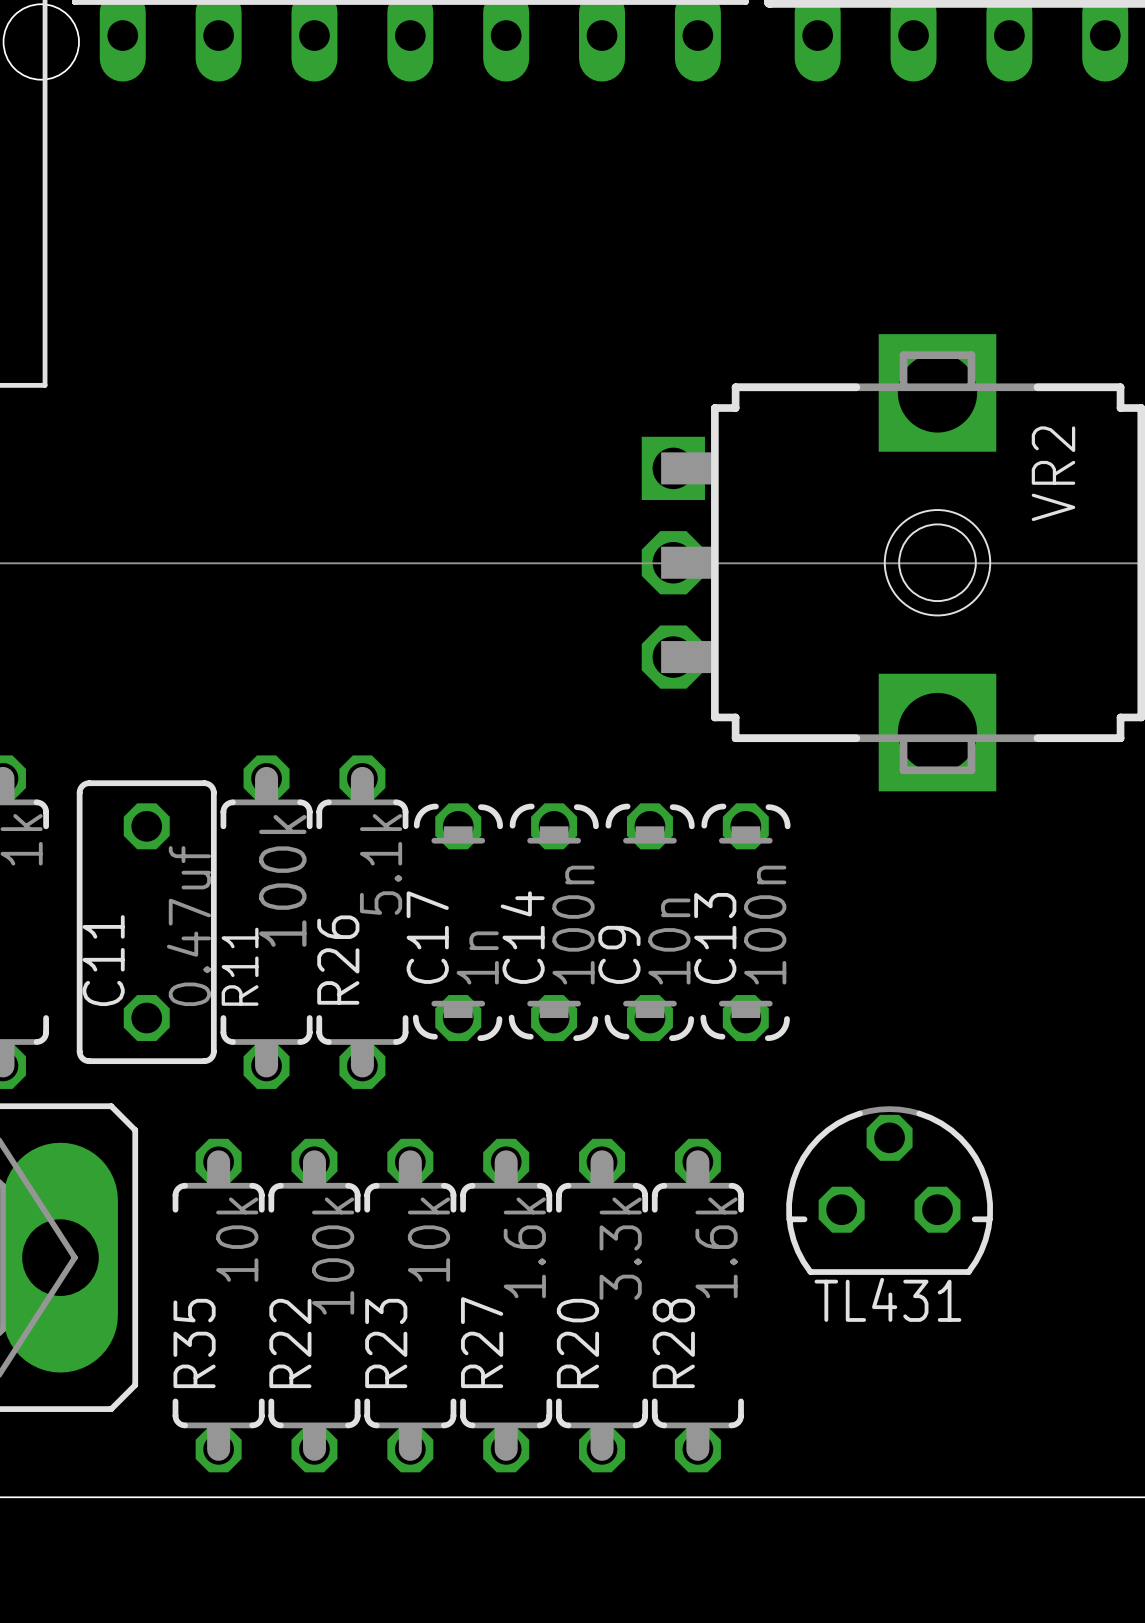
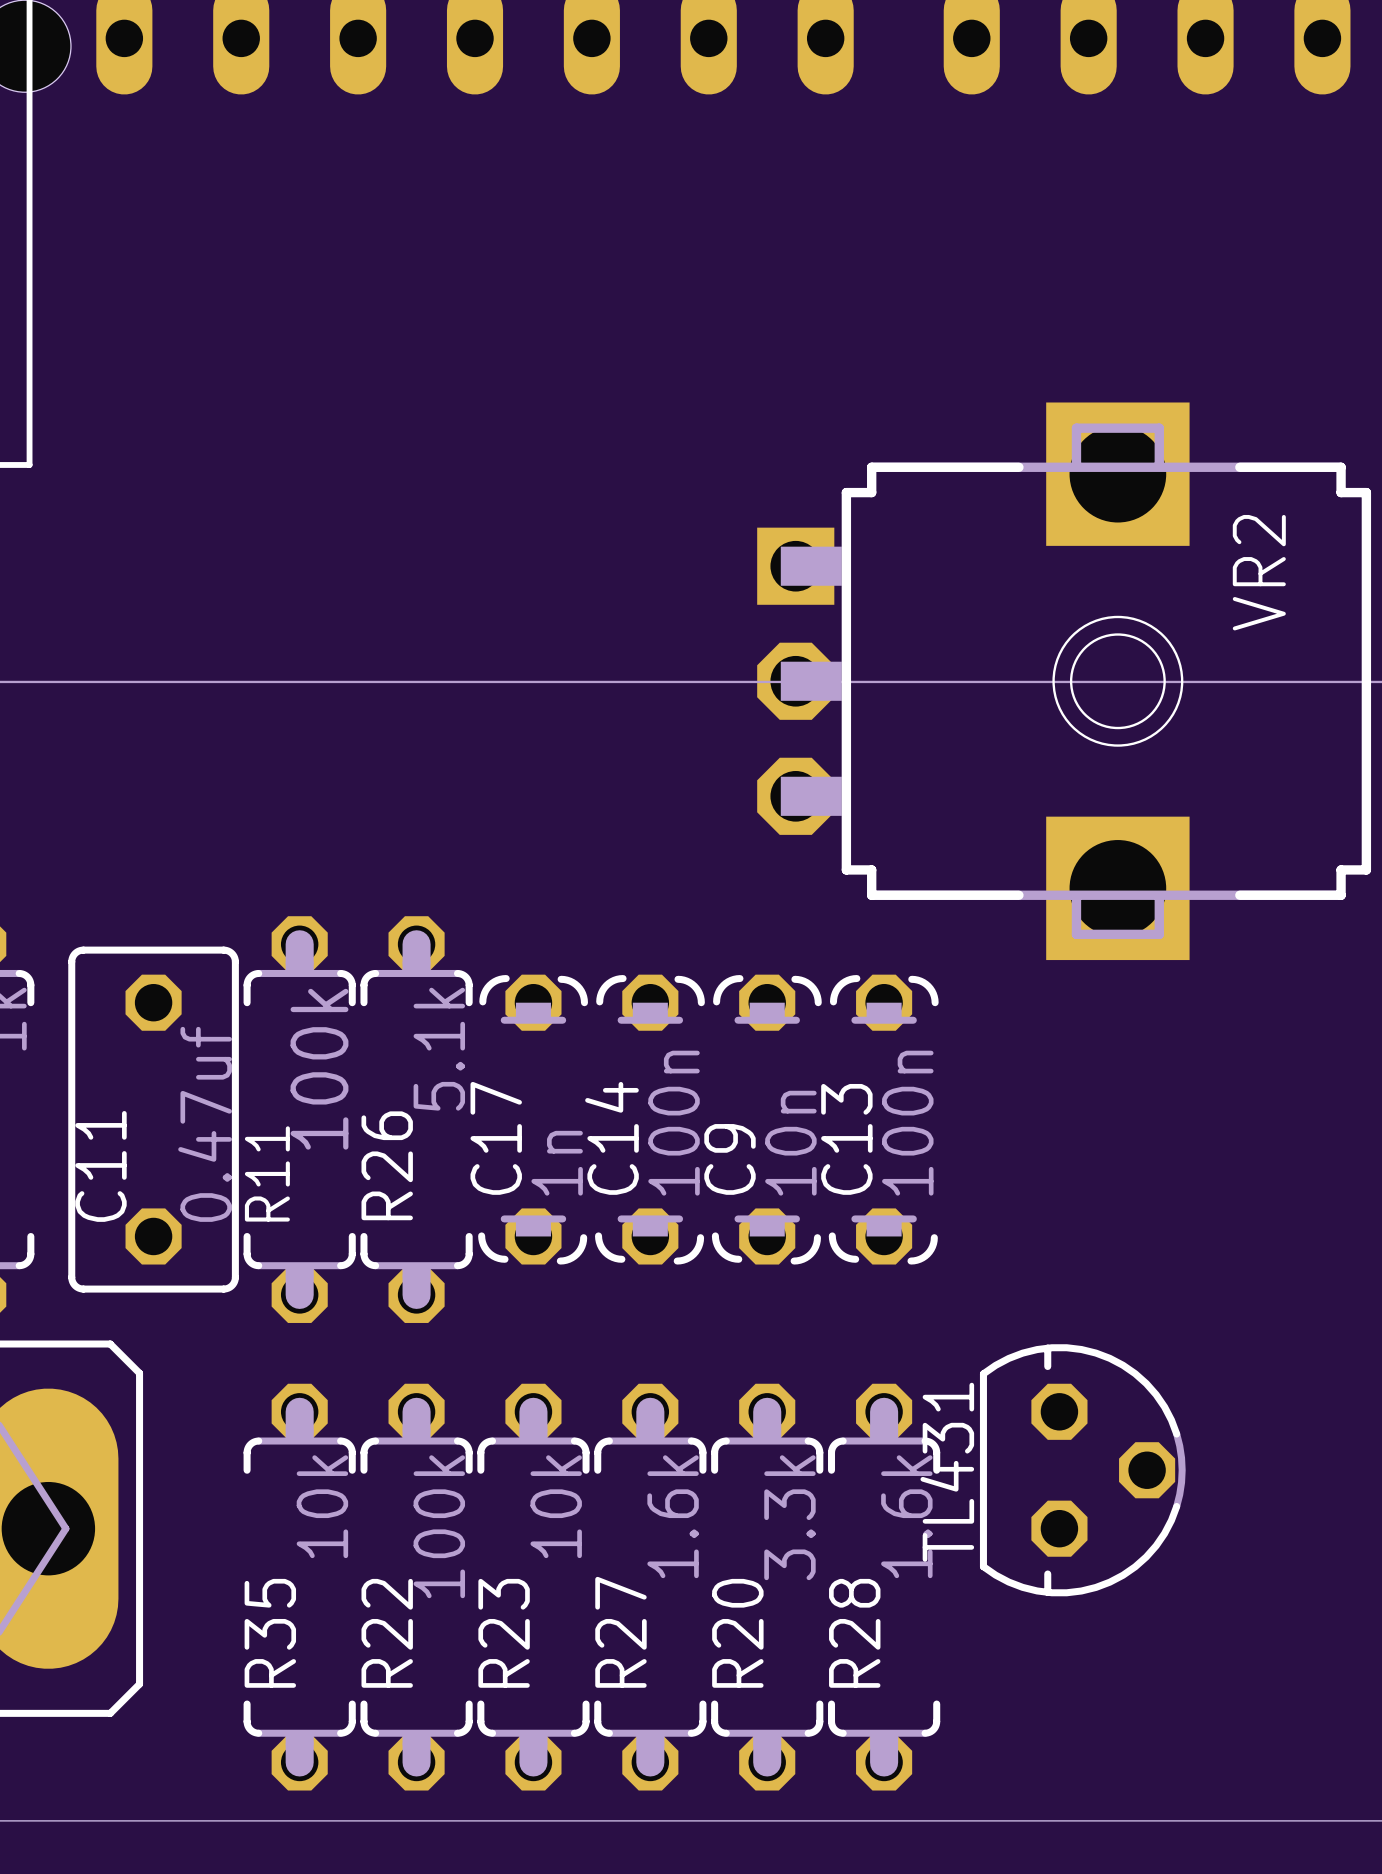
TL431 rotation: 0° (889, 1190) -> 90° clockwise (1082, 1470)
R35 position: (218, 1305) -> (299, 1587)
R22 position: (314, 1305) -> (416, 1587)
R23 position: (410, 1305) -> (533, 1587)
R27 position: (506, 1305) -> (650, 1587)
R20 position: (602, 1305) -> (767, 1587)
R28 position: (697, 1305) -> (884, 1587)

